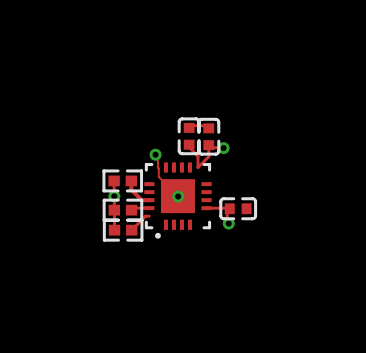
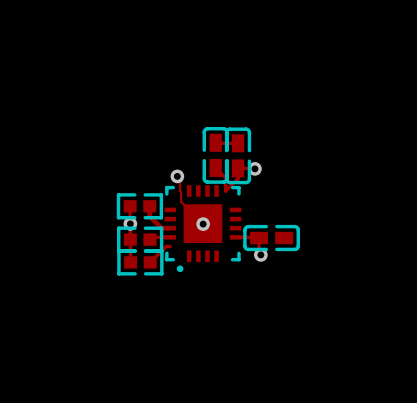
part footprint: [177, 117, 201, 156] -> [202, 127, 229, 184]
part footprint: [197, 117, 221, 156] -> [224, 127, 252, 185]
part footprint: [219, 197, 258, 221] -> [243, 224, 300, 252]

